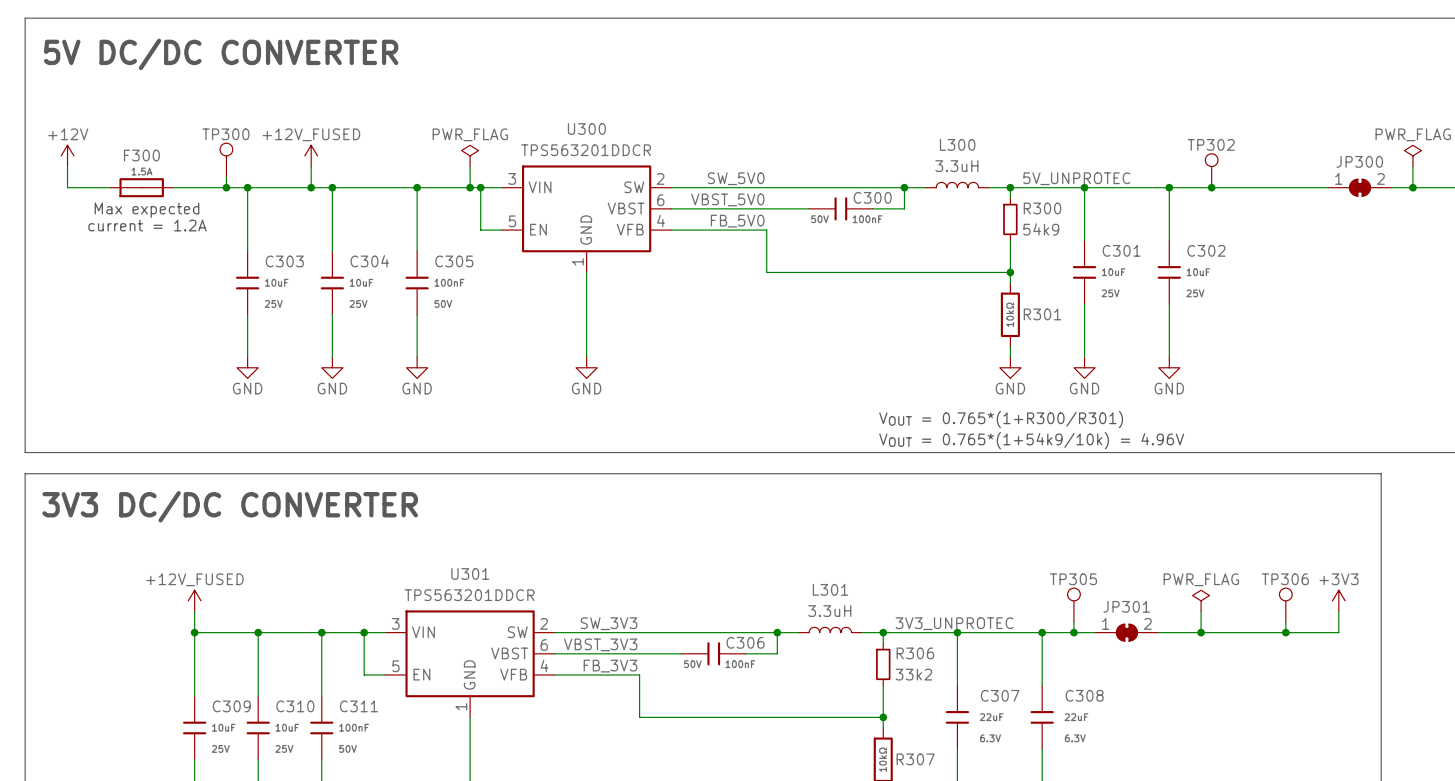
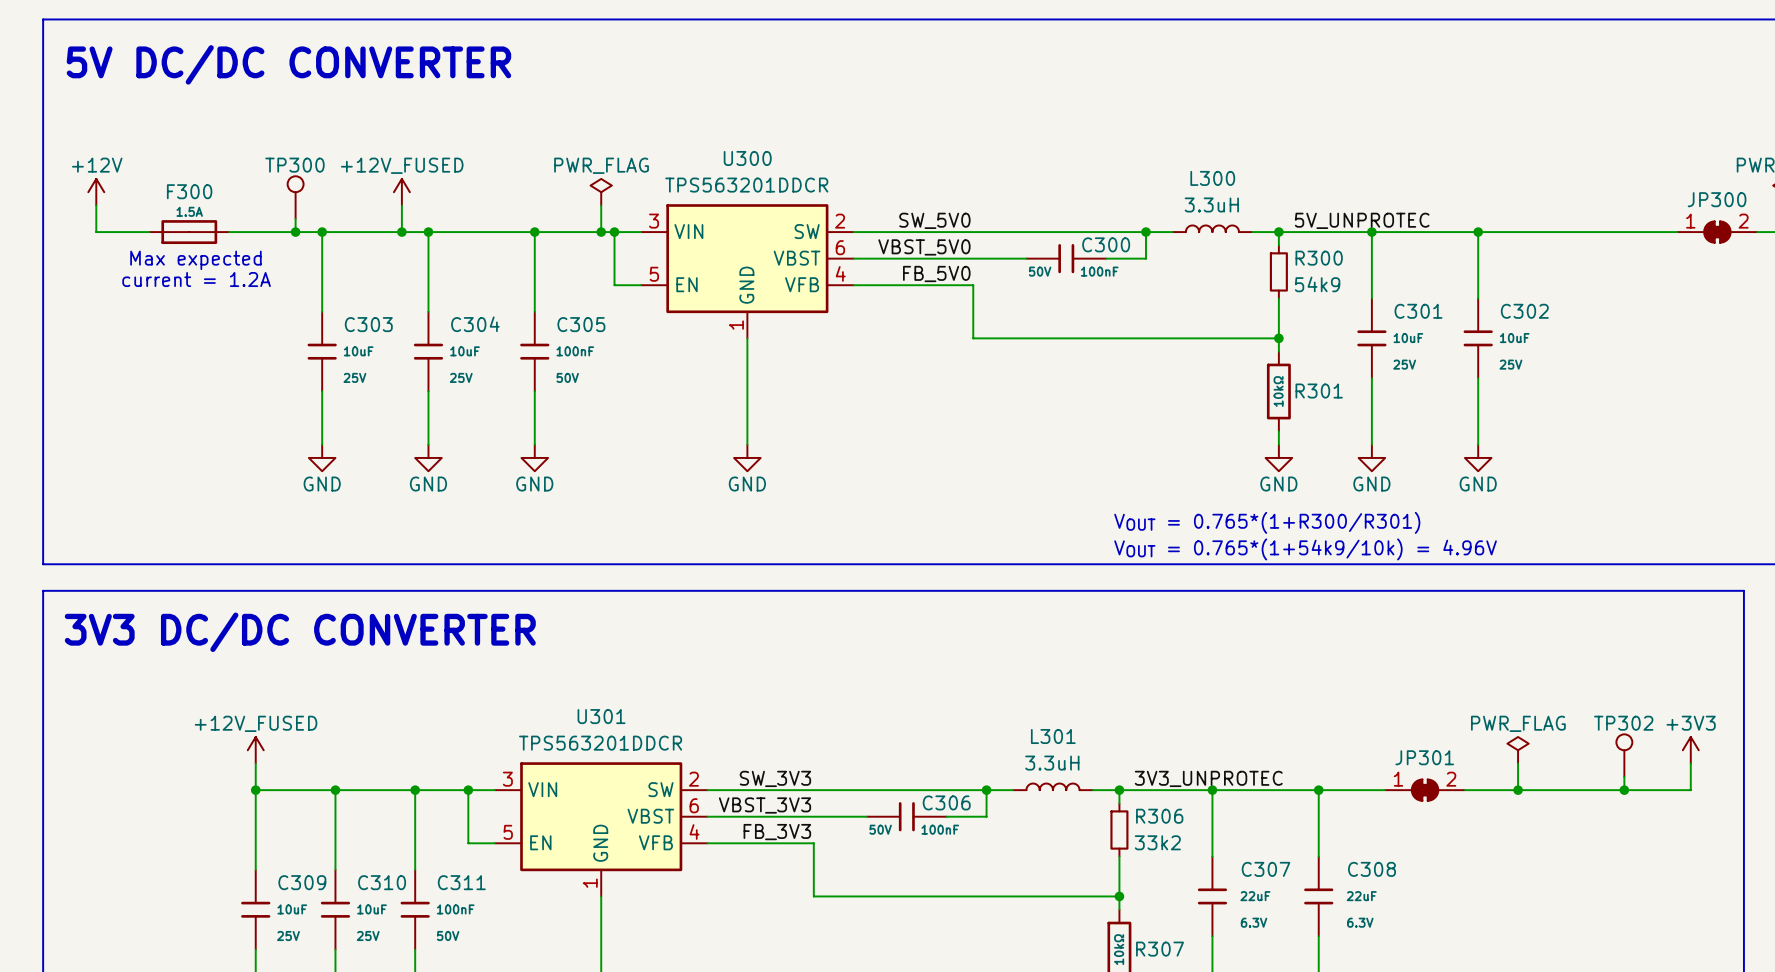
TP302: (1211, 170) -> none
junction: (1211, 187) -> none
TP306 name: TP306 (1285, 579) -> TP302 (1623, 723)
TP305: (1073, 605) -> none
wire: (1073, 622) (1073, 632) -> none
junction: (1073, 632) -> none

